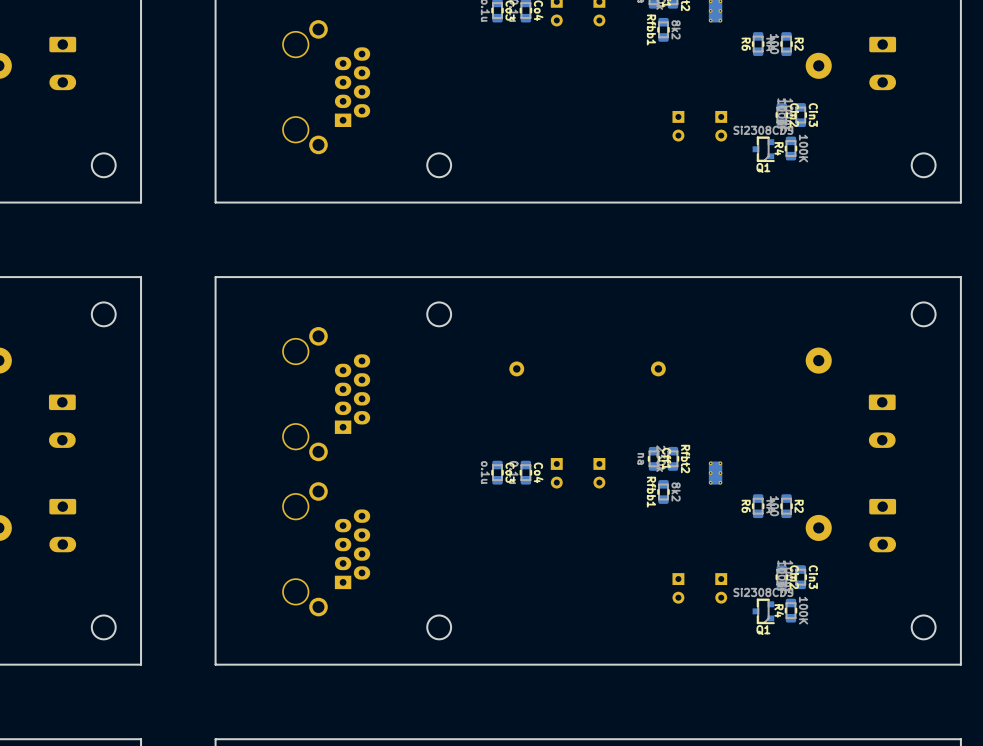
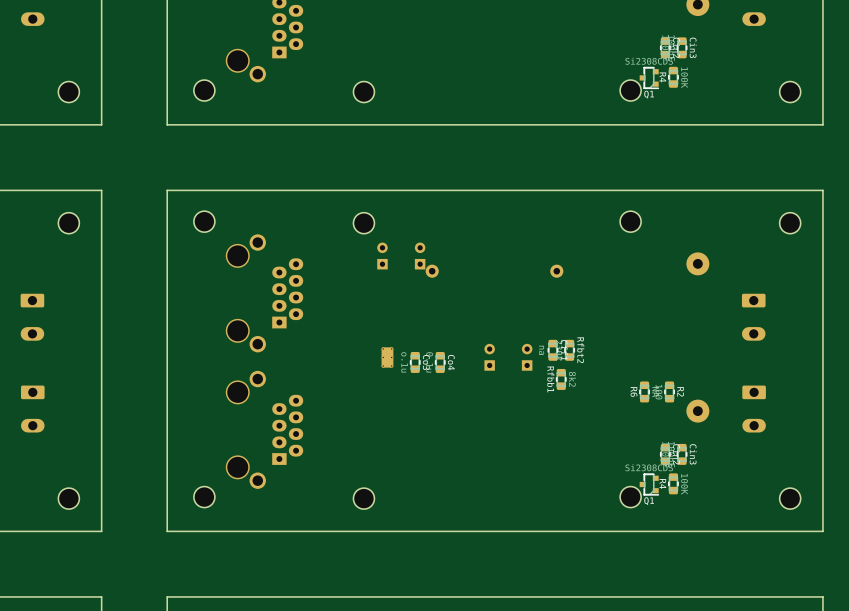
part: (678, 126) -> none
part: (721, 126) -> none
part: none -> (204, 90)
part: none -> (630, 90)
part: none -> (204, 221)
part: none -> (630, 221)
part: none -> (382, 256)
part: none -> (420, 256)
part: none -> (387, 357)
part: none -> (489, 357)
part: none -> (527, 357)
part: (556, 473) -> none
part: (599, 473) -> none
part: (715, 473) -> none
part: (678, 588) -> none
part: (721, 588) -> none
part: none -> (204, 497)
part: none -> (630, 497)

